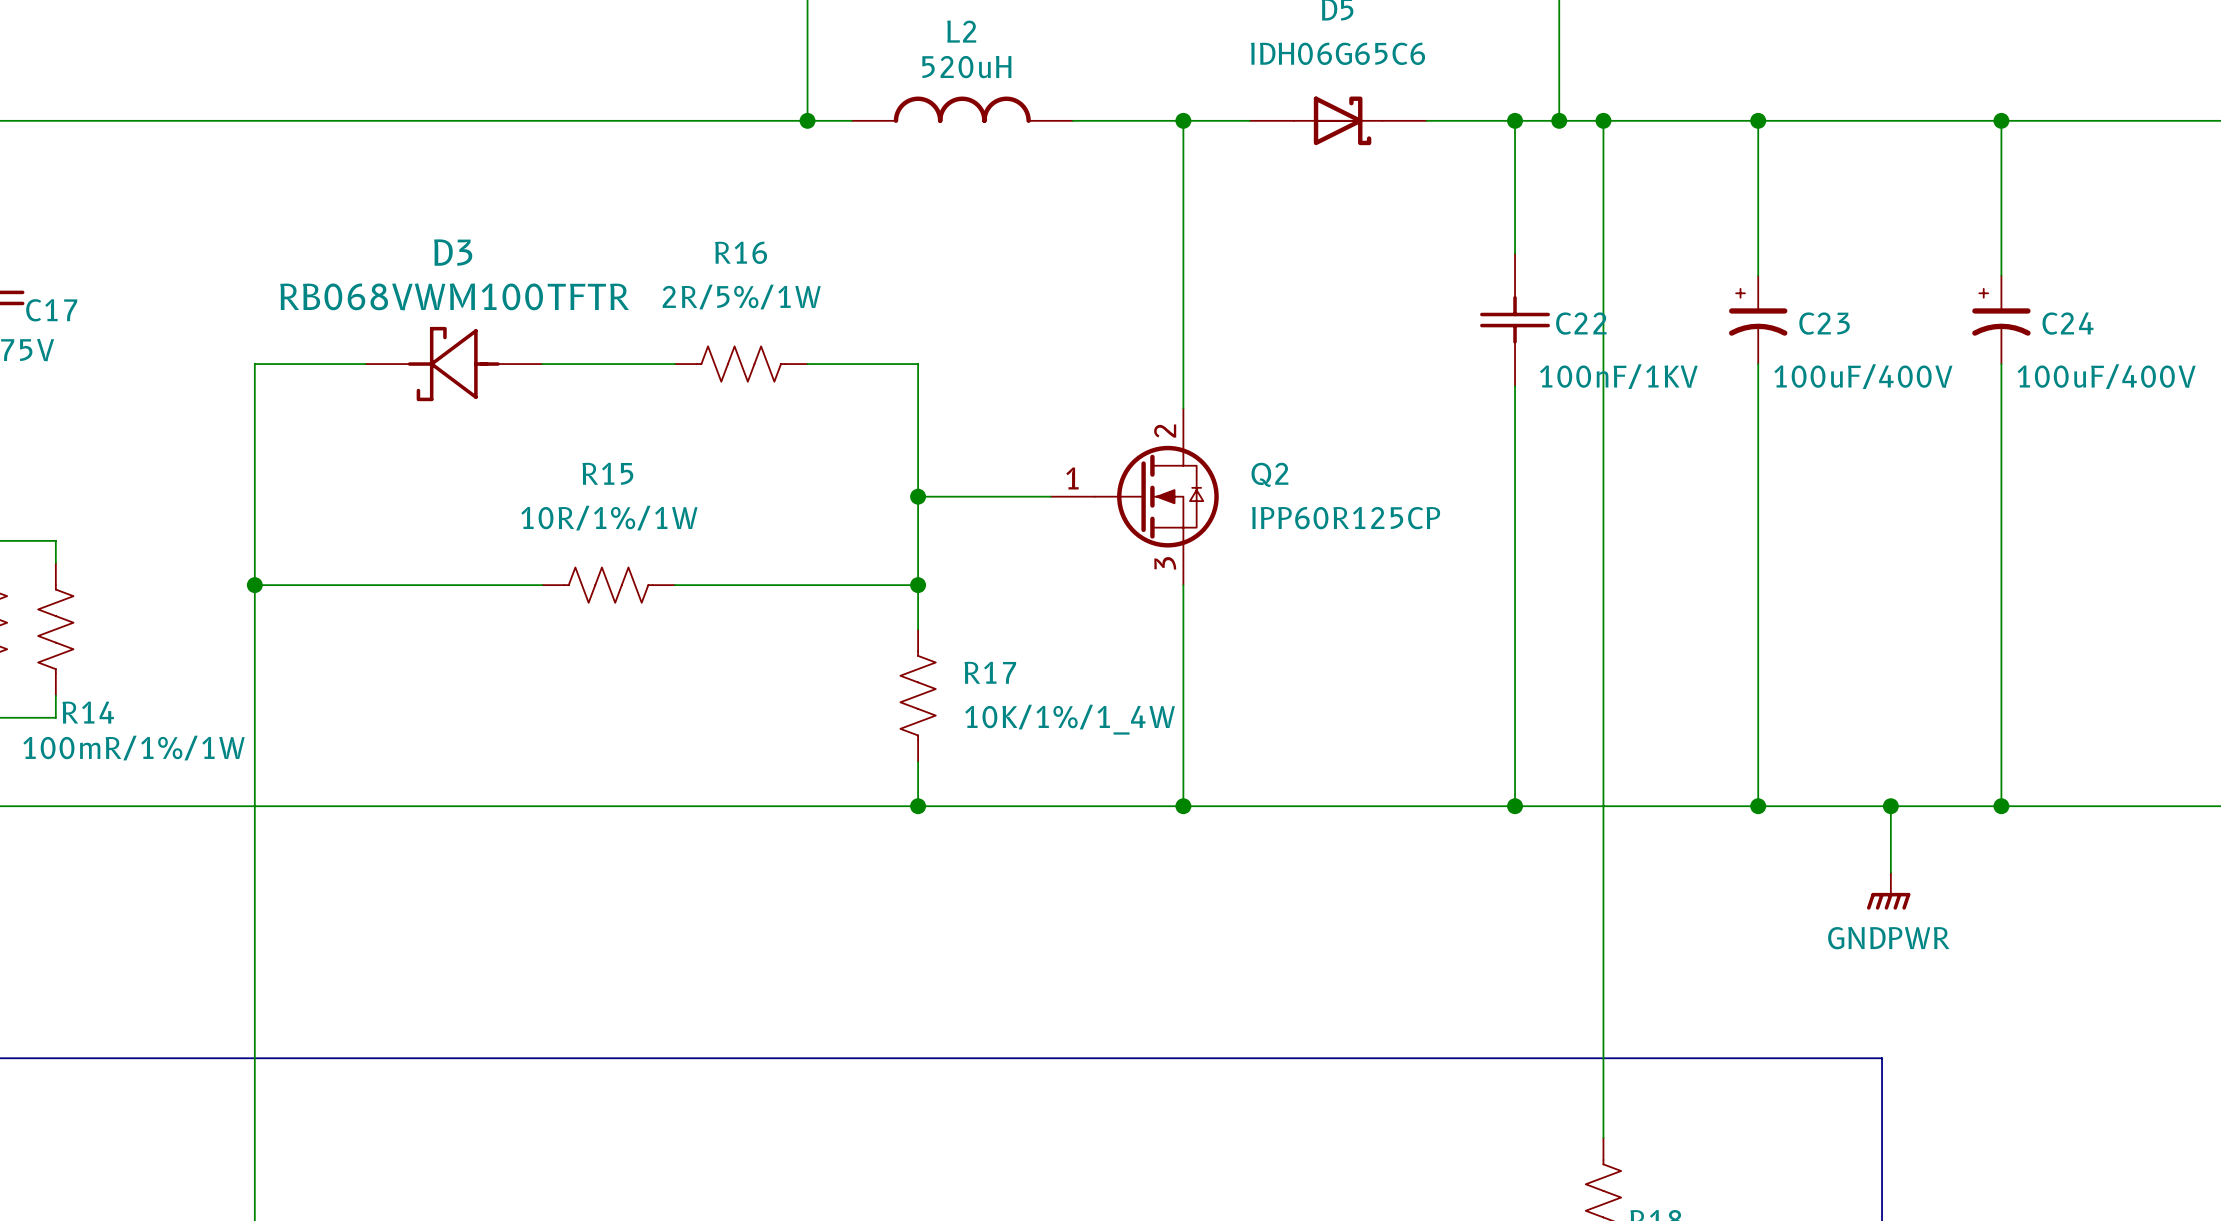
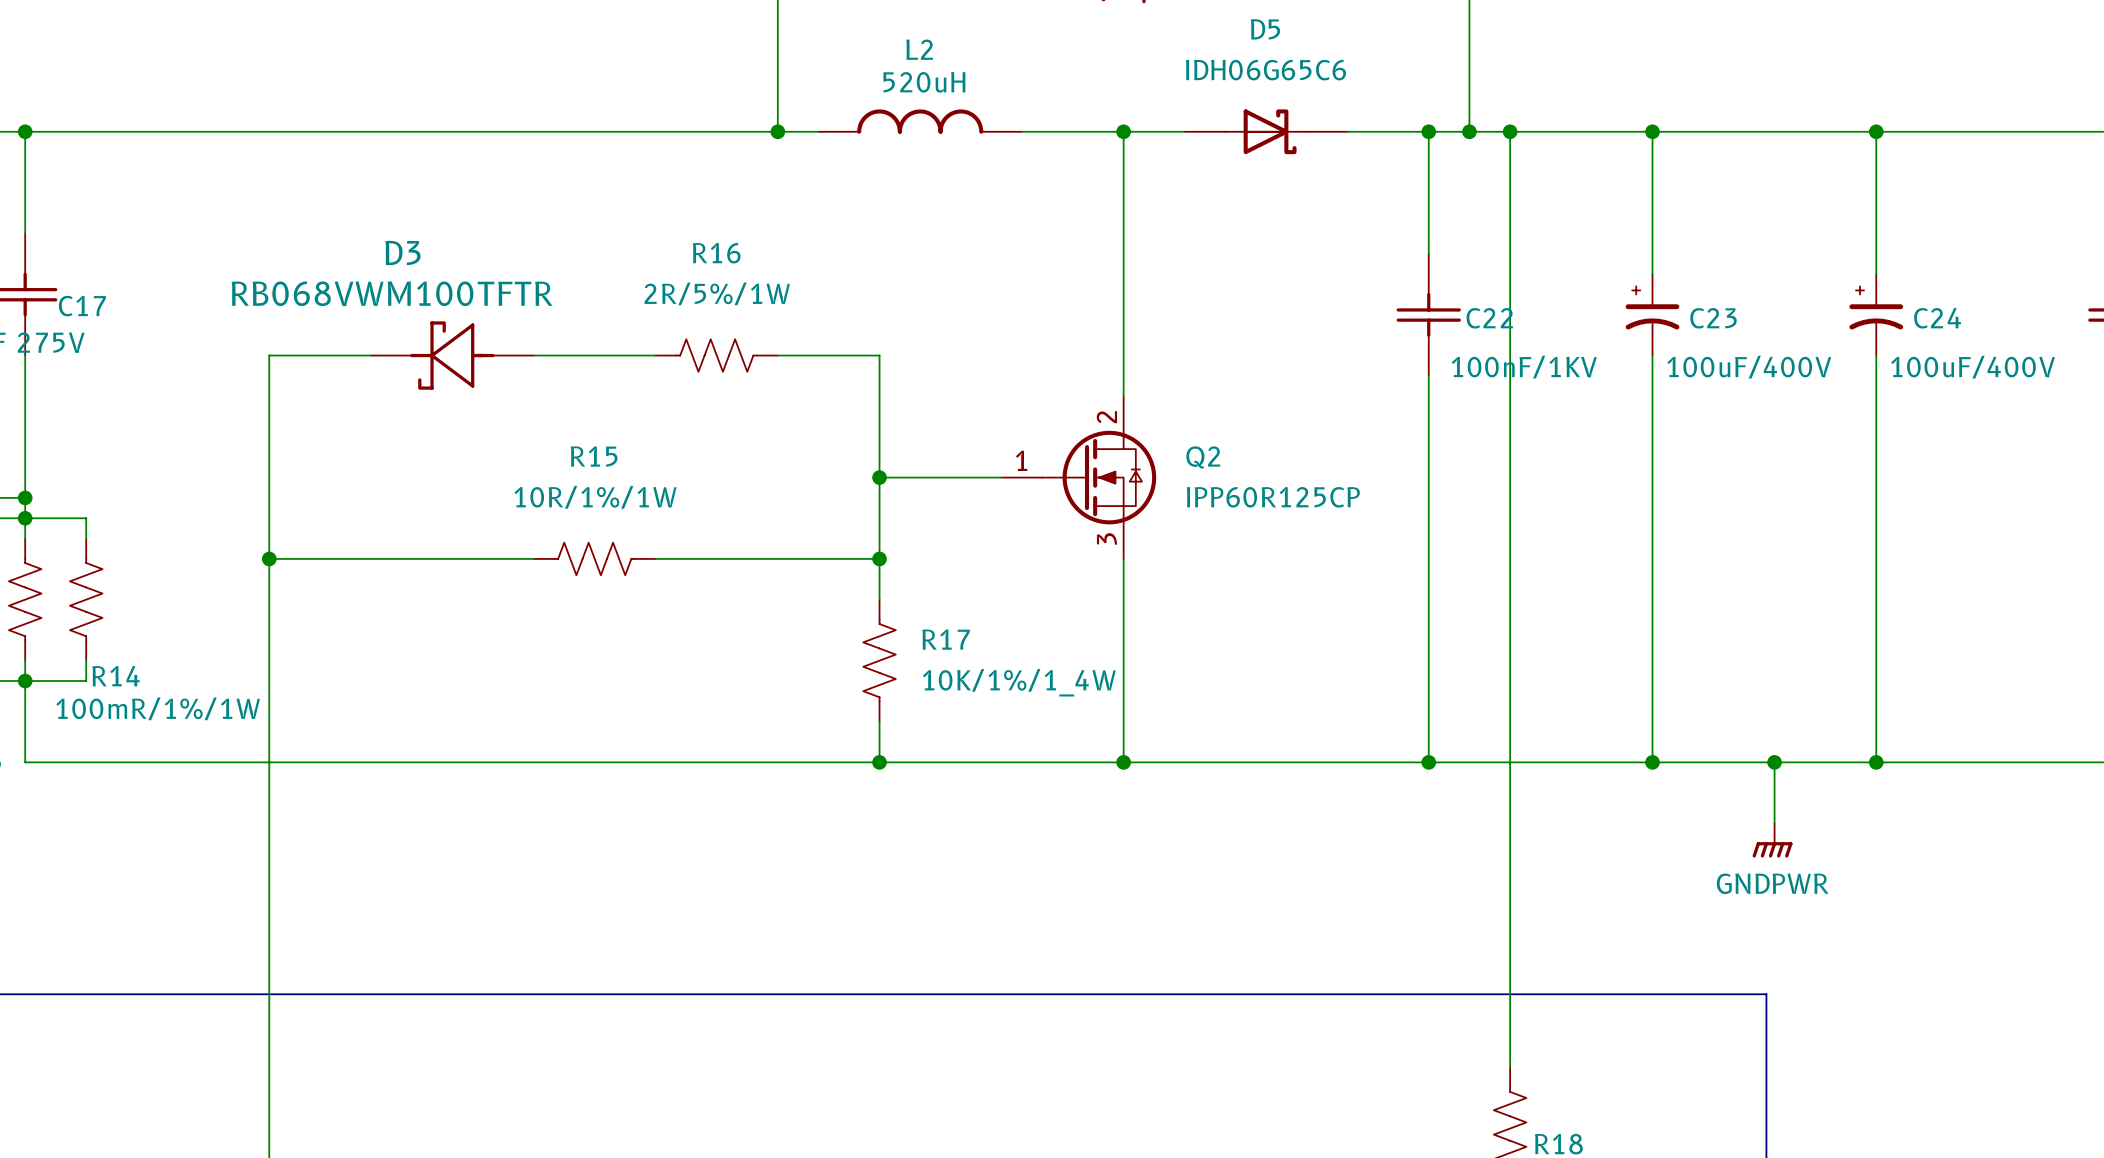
D3 name position: D3 (453, 252) -> D3 (402, 252)
D3 value position: RB068VWM100TFTR (454, 296) -> RB068VWM100TFTR (392, 293)

